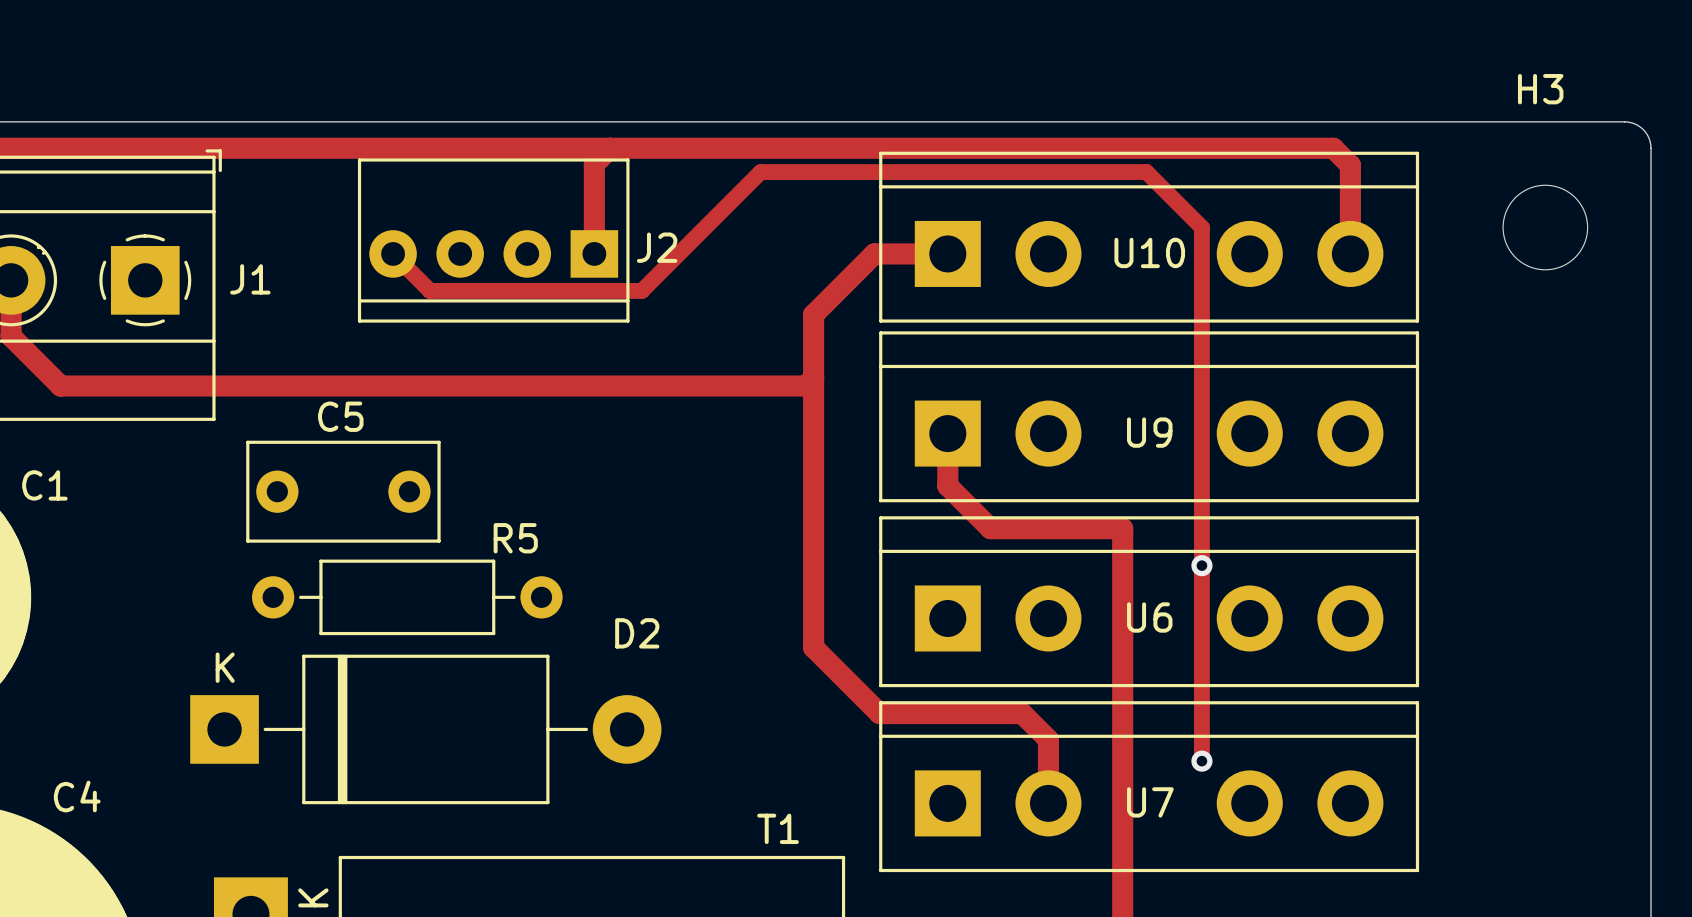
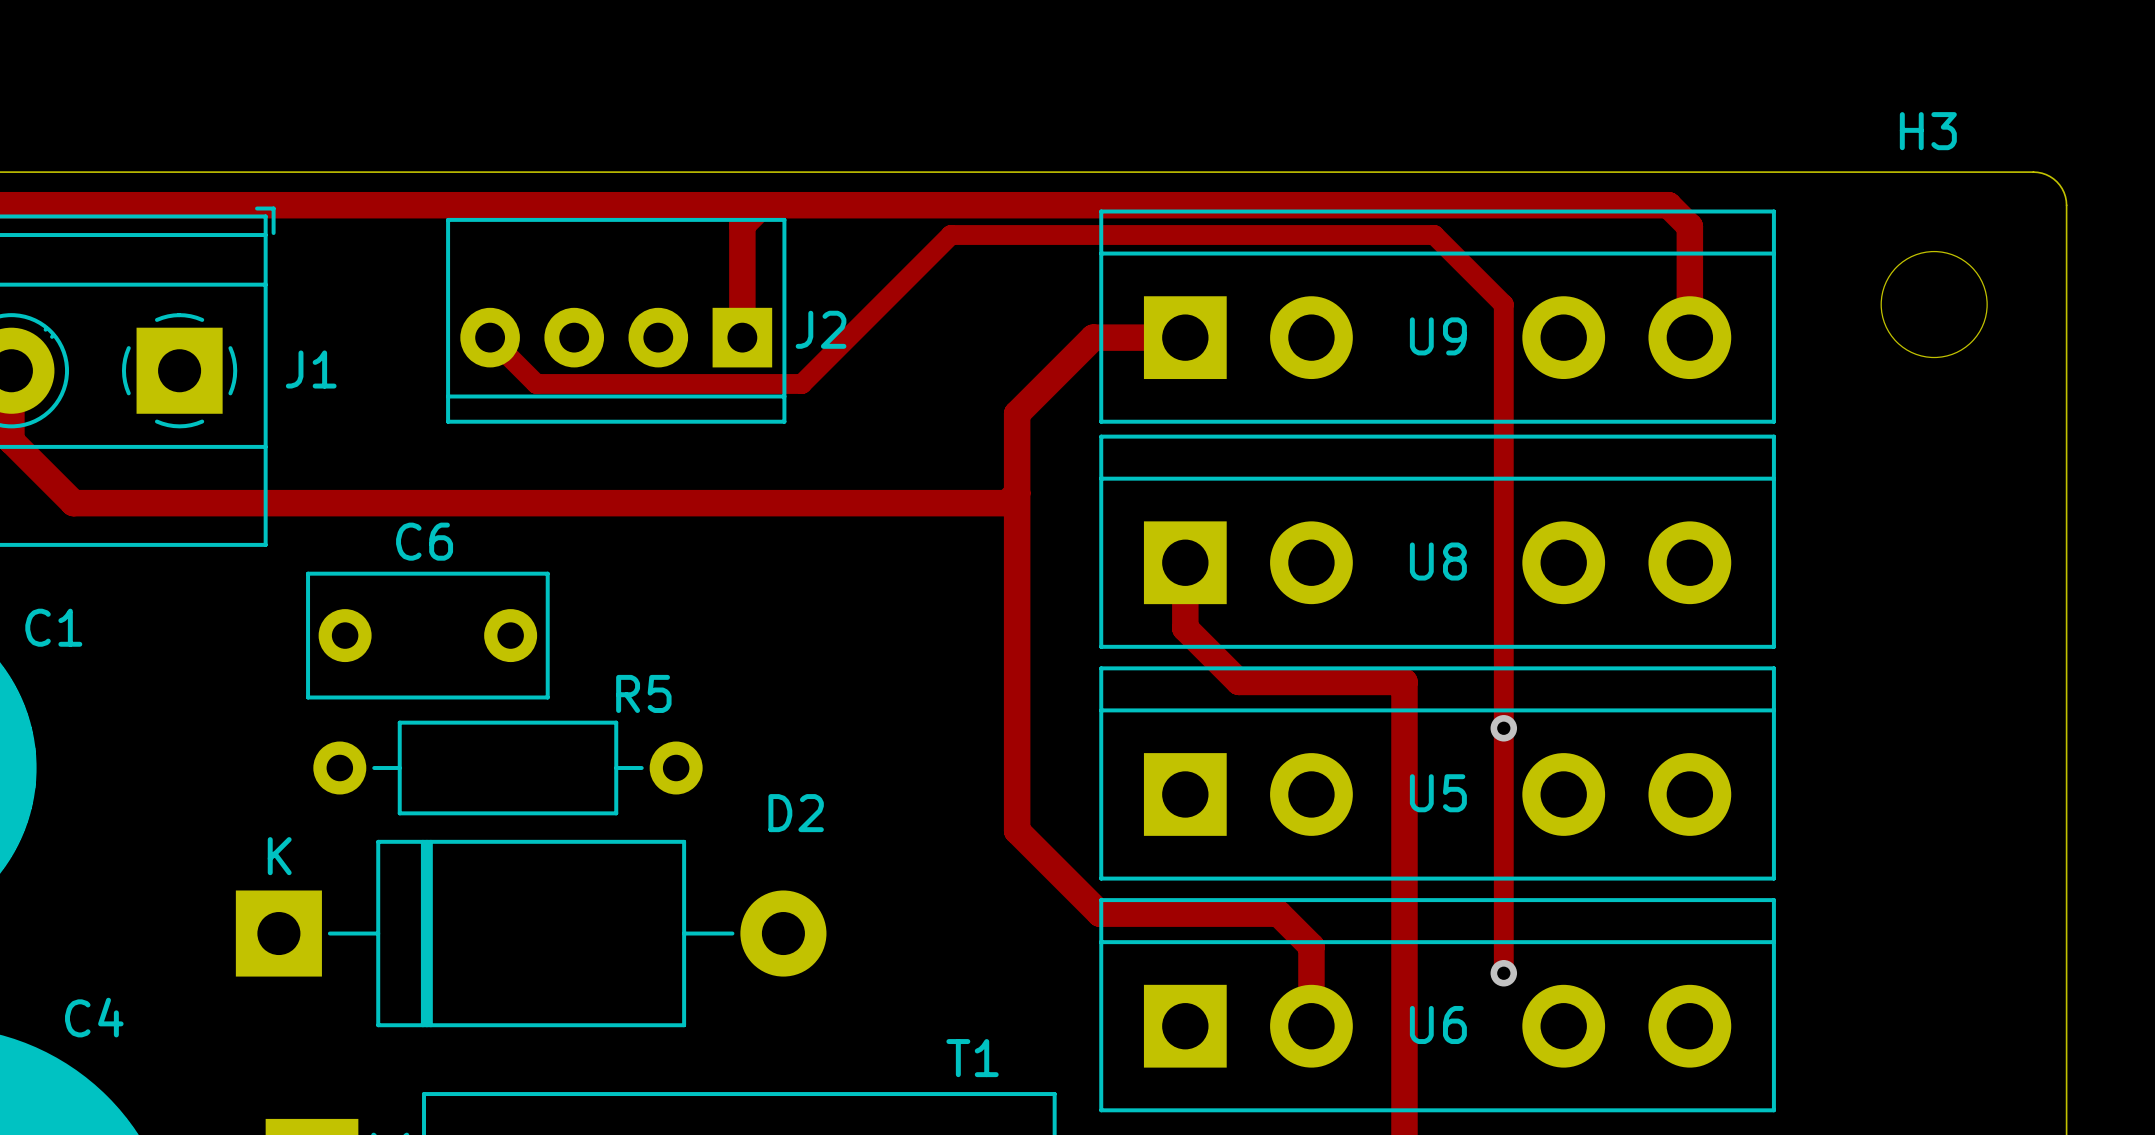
U10 name: U10 (1149, 252) -> U9 (1438, 336)
C5 name: C5 (340, 416) -> C6 (424, 541)
U9 name: U9 (1149, 432) -> U8 (1438, 561)
U6 name: U6 (1149, 617) -> U5 (1438, 793)
U7 name: U7 (1150, 802) -> U6 (1438, 1024)

